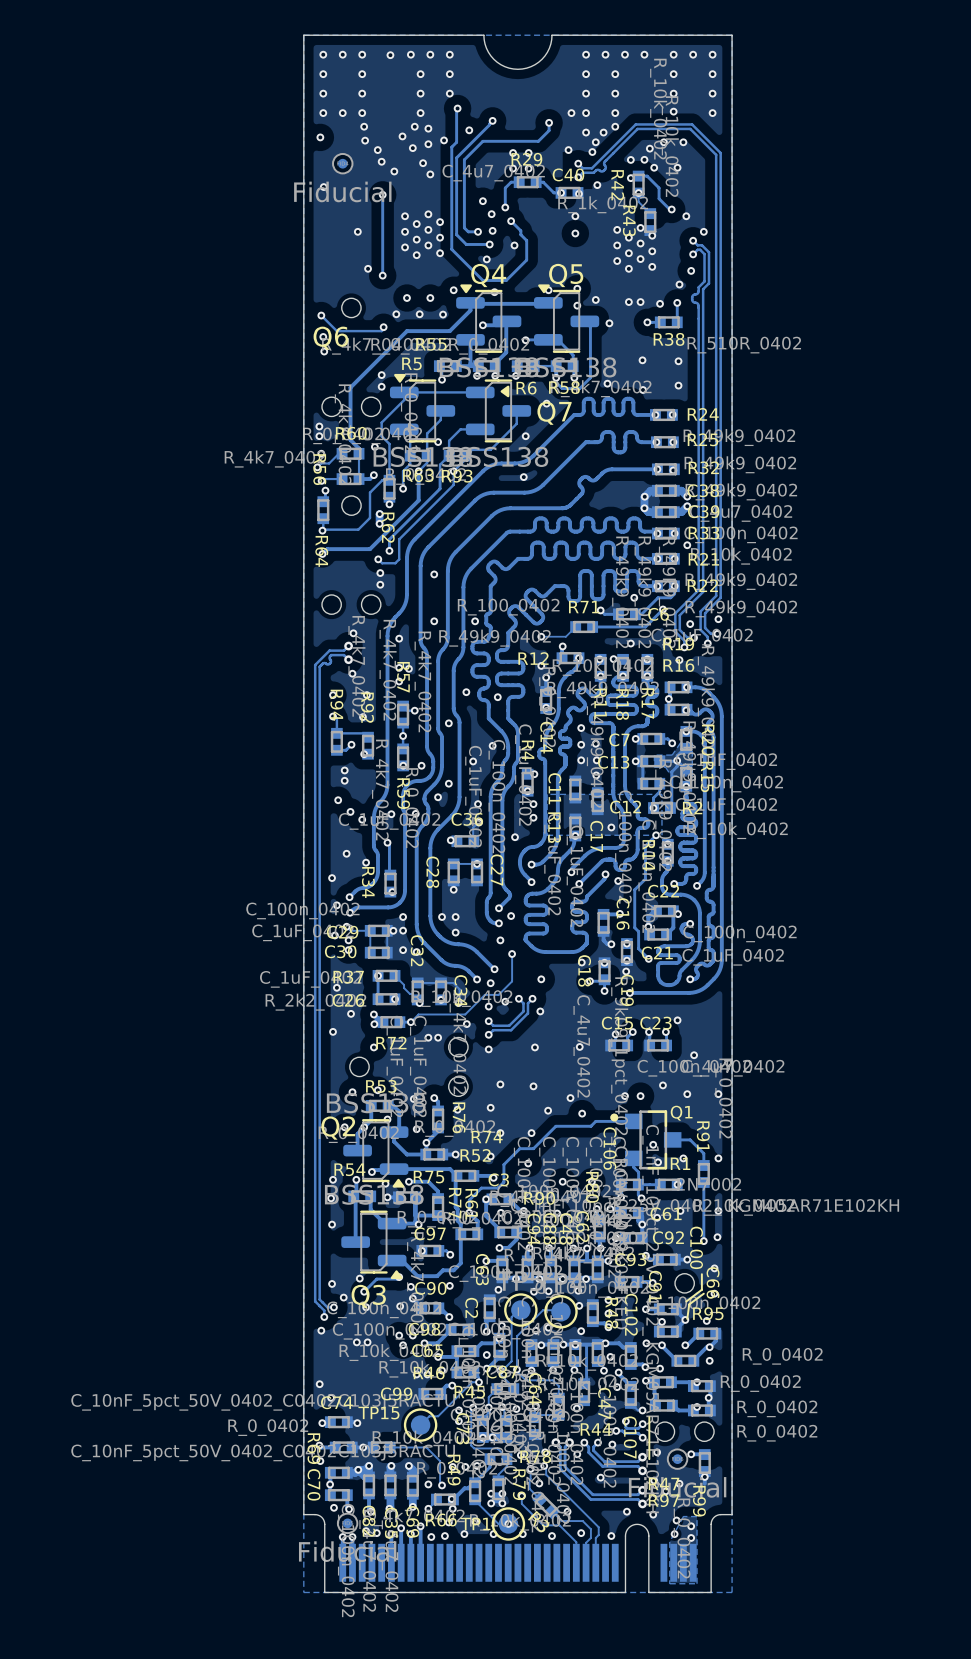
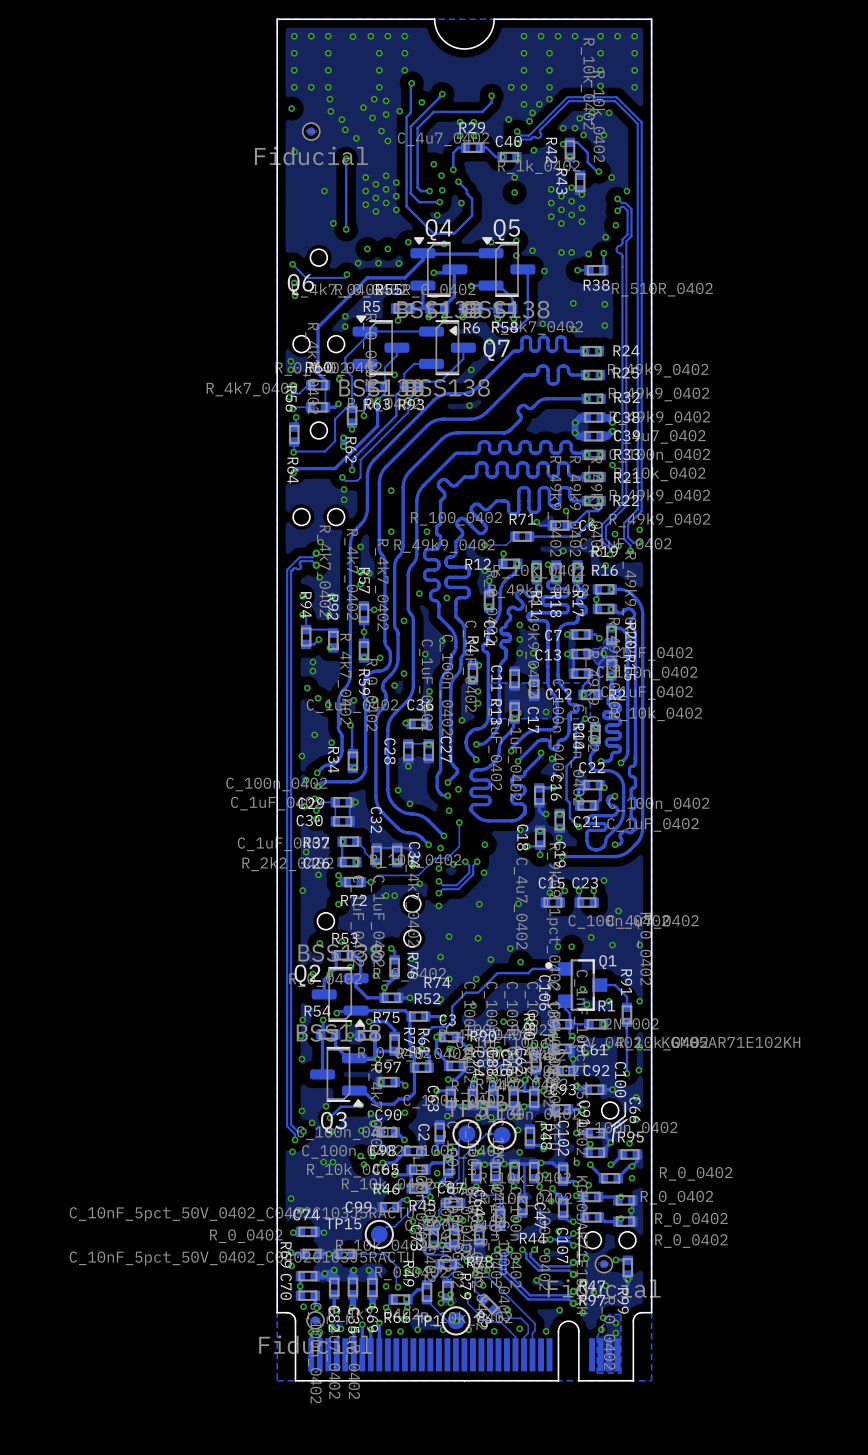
via: (595, 743) -> none
via: (403, 917) -> none
via: (455, 917) -> none
via: (403, 930) -> none
via: (403, 950) -> none
via: (416, 952) -> none

